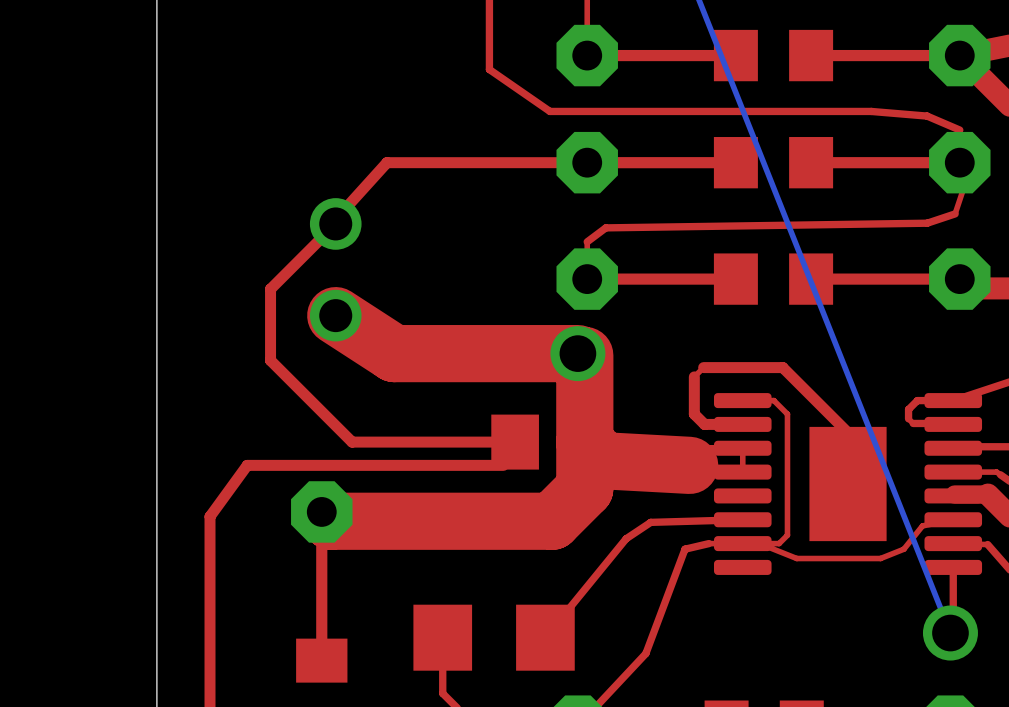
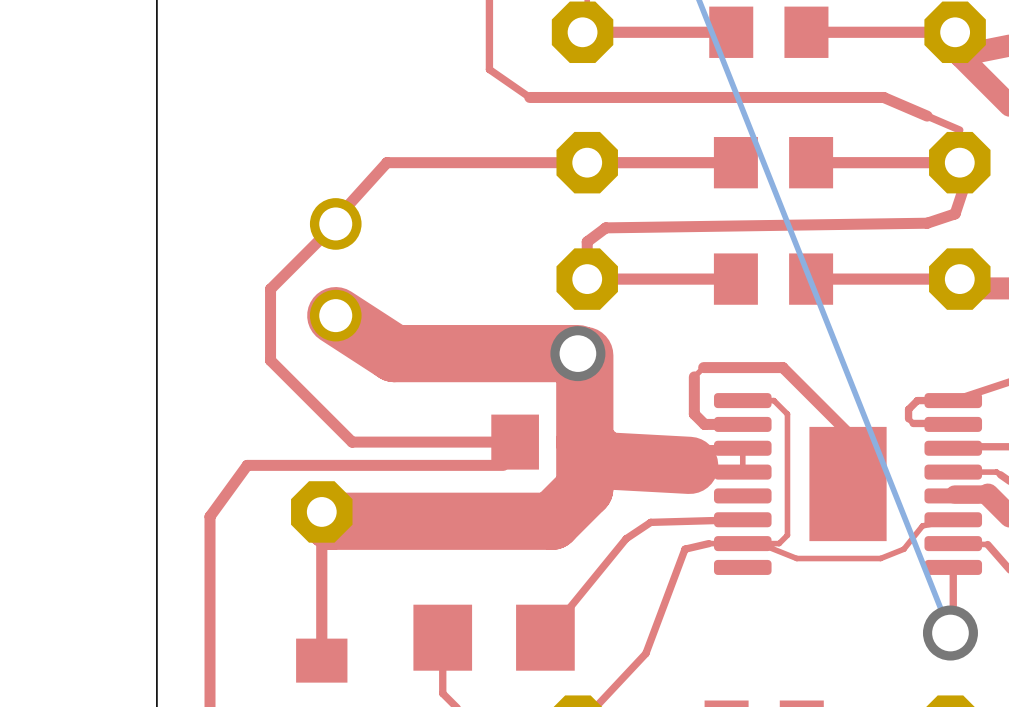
part position: (773, 55) -> (768, 32)
top track: (529, 97) (549, 111) (871, 111) (927, 116) -> (529, 97) (883, 97) (927, 116)
top track width: thin (964, 178) (964, 185) (955, 213) (927, 223) (605, 227) (587, 241) (587, 279) -> thick (964, 178) (964, 185) (955, 213) (927, 223) (605, 227) (587, 241) (587, 279)

